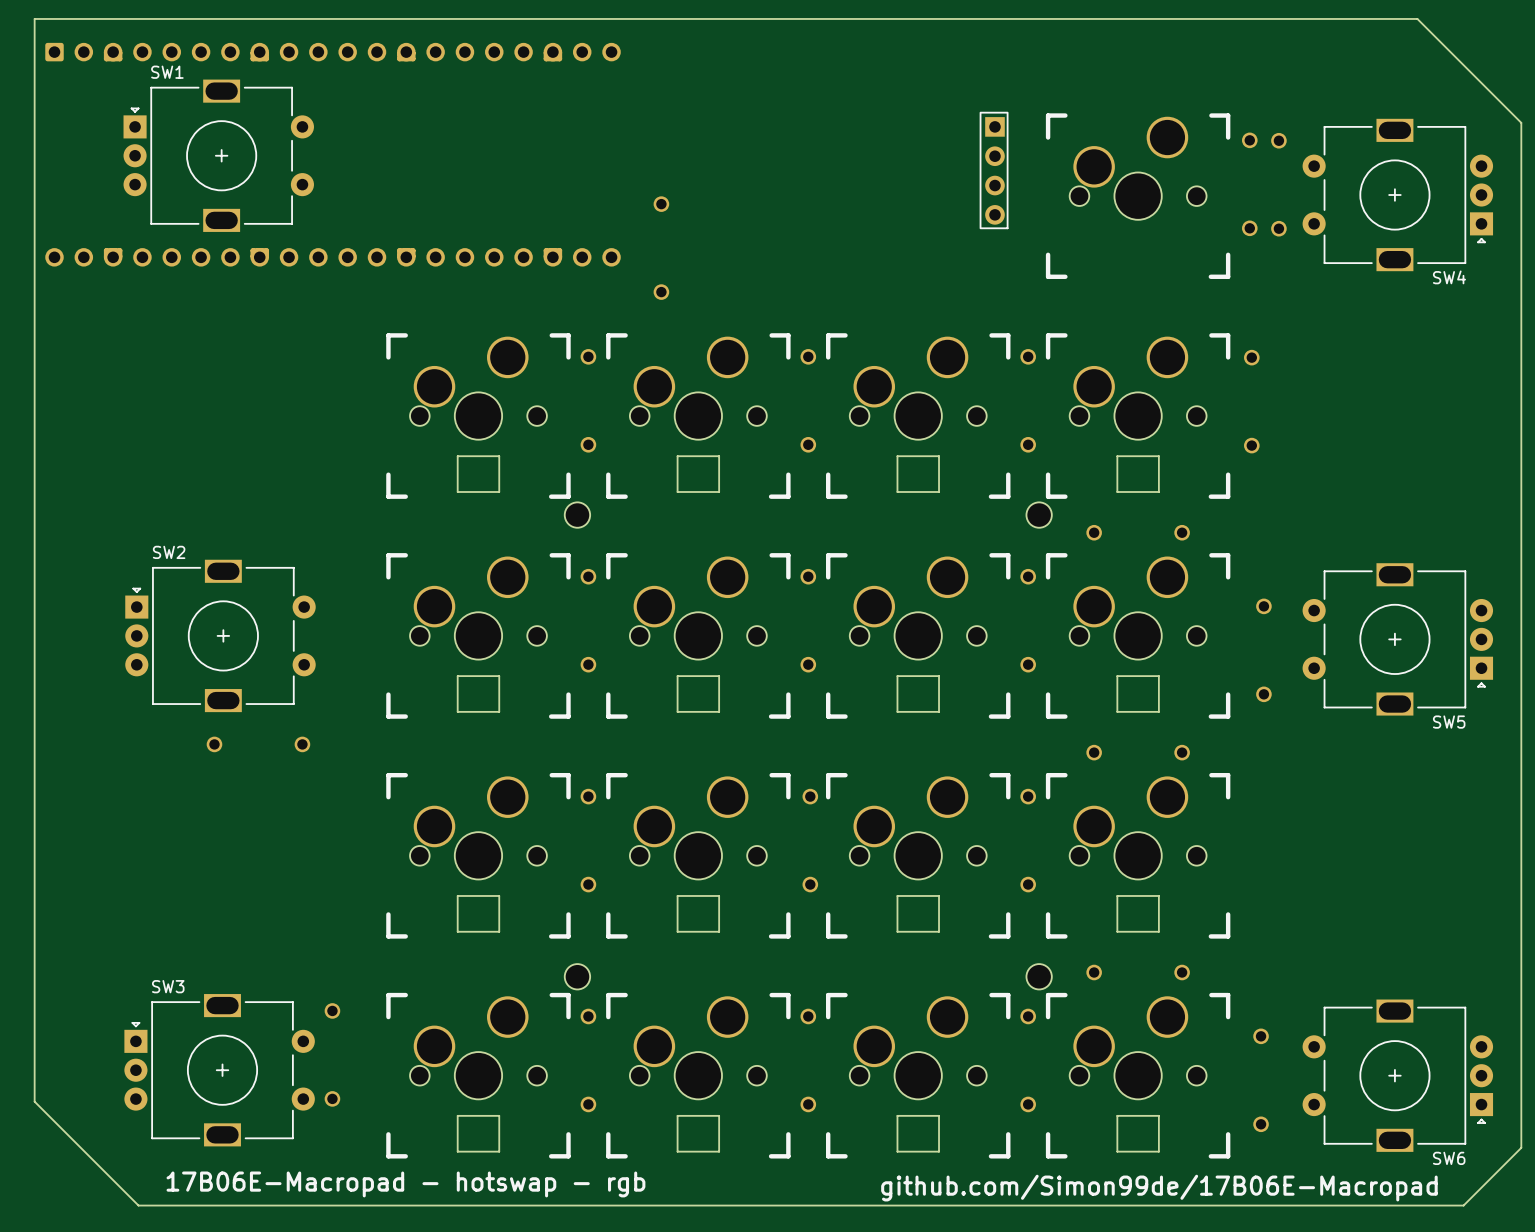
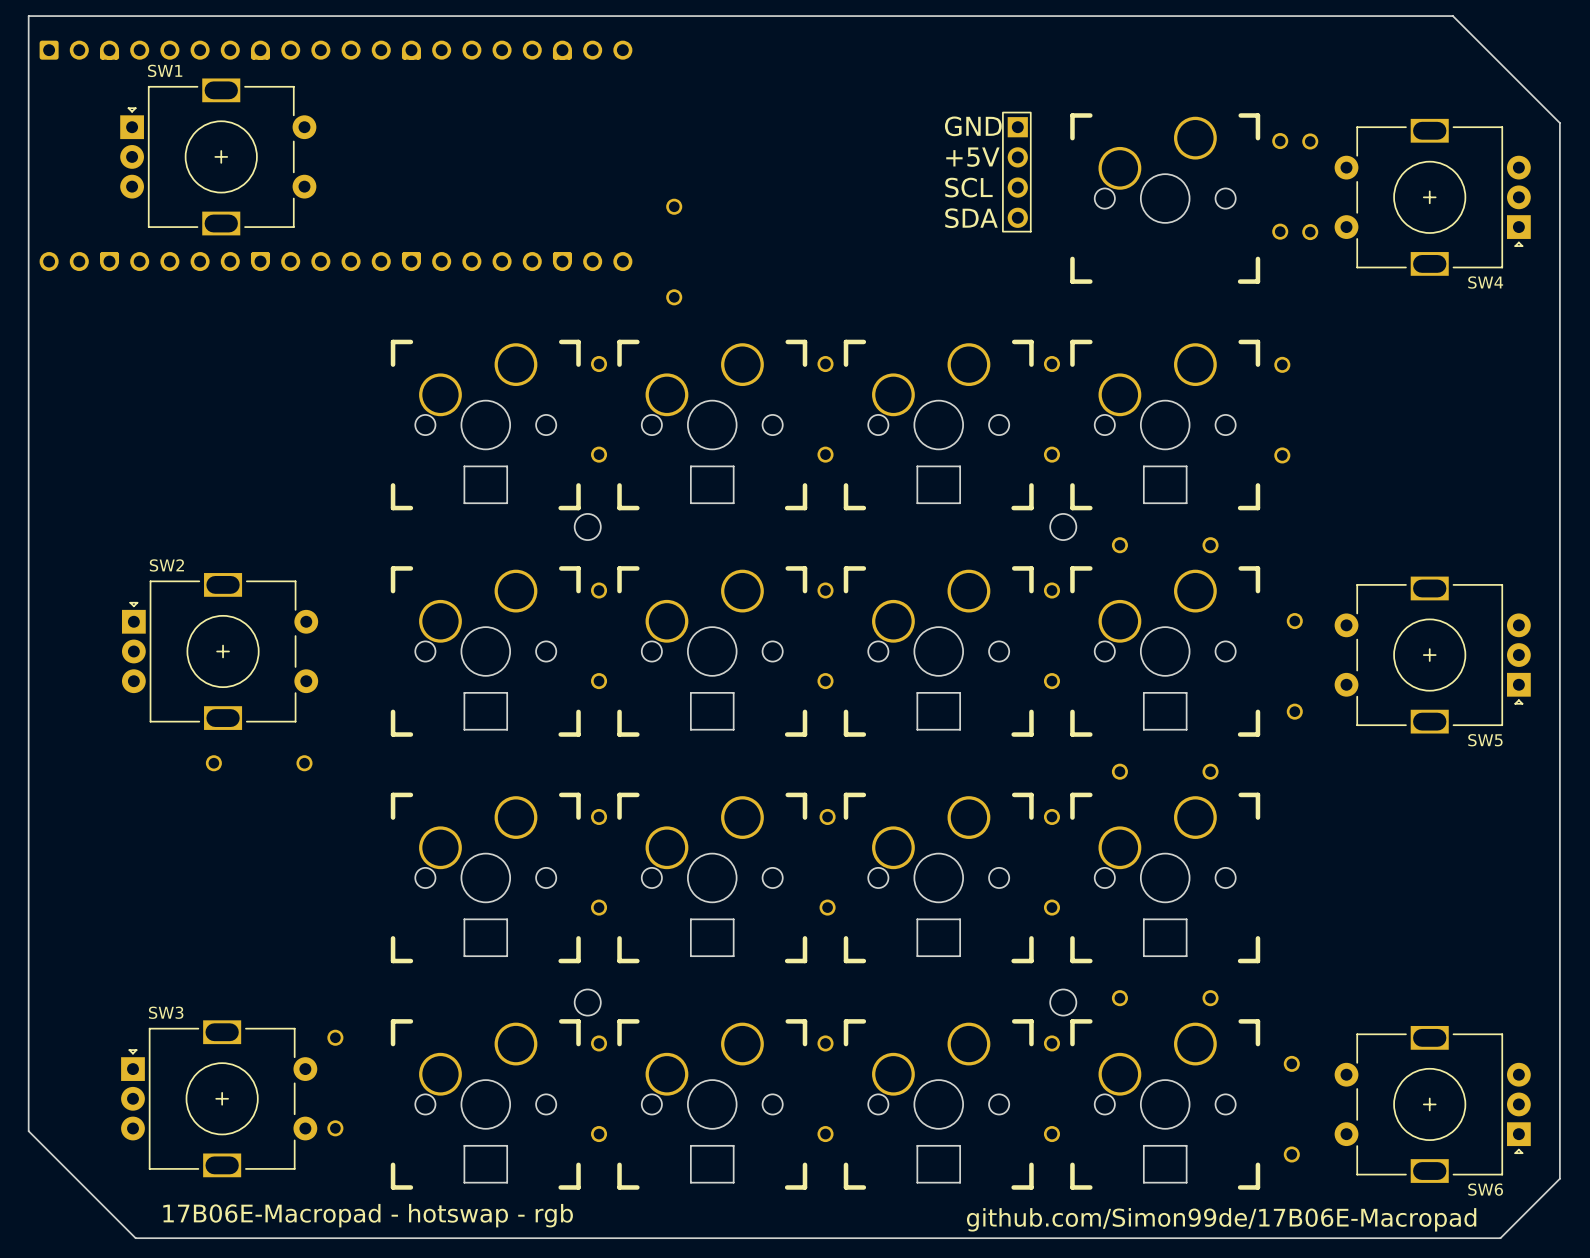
text: none -> GND (973, 126)
text: none -> +5V (972, 157)
text: none -> SCL (968, 187)
text: none -> SDA (971, 218)

